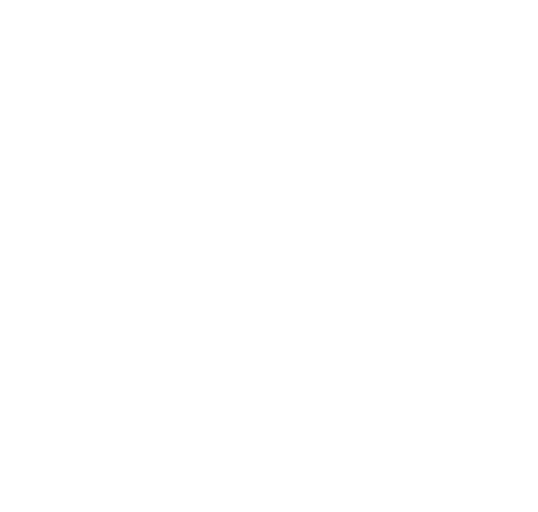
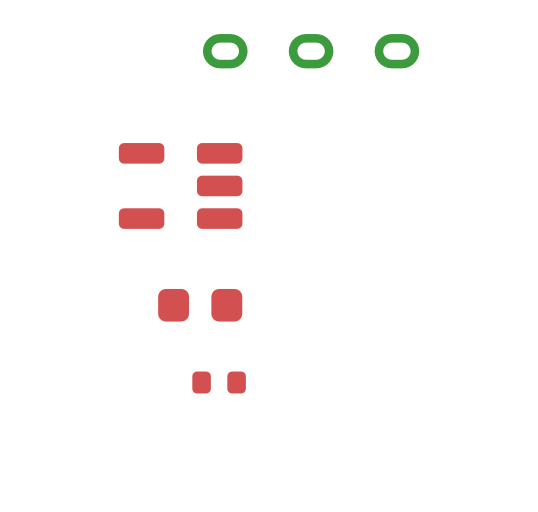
part: none -> (311, 51)
part: none -> (180, 185)
part: none -> (200, 305)
part: none -> (219, 382)

